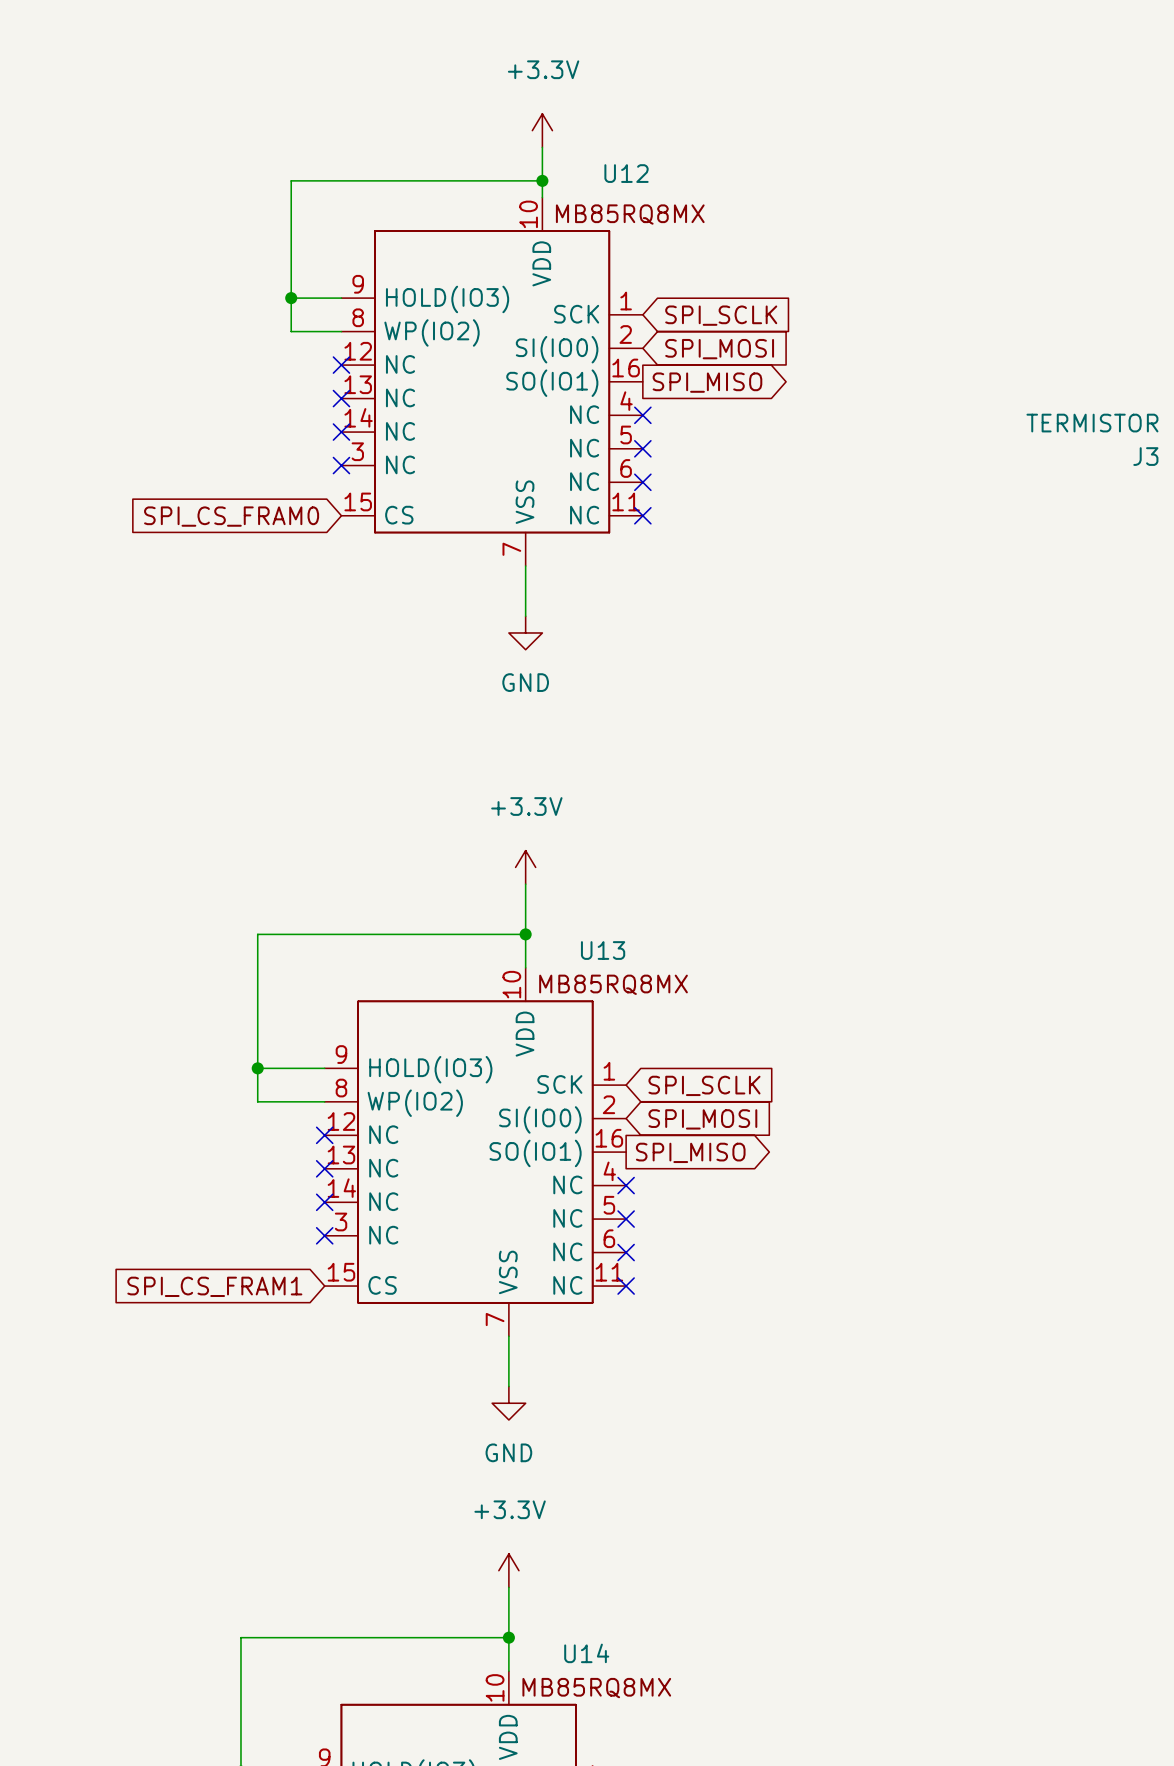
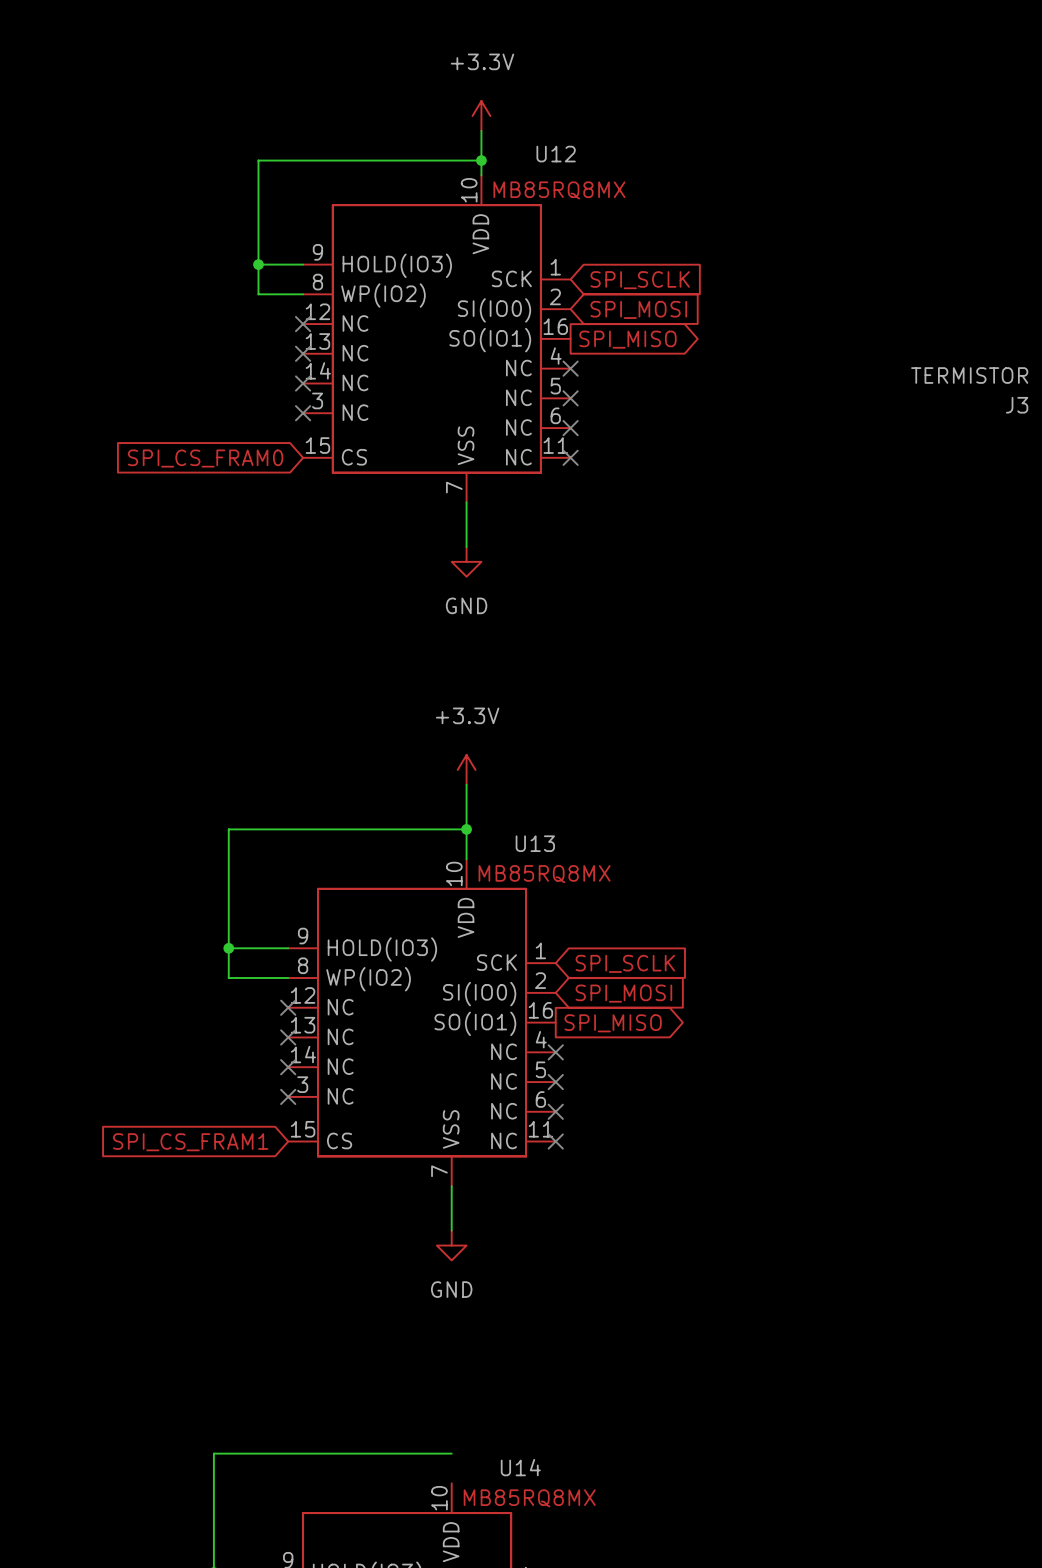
power symbol: +3.3V (508, 1570) -> none
wire: (508, 1587) (508, 1671) -> none
junction: (508, 1637) -> none

